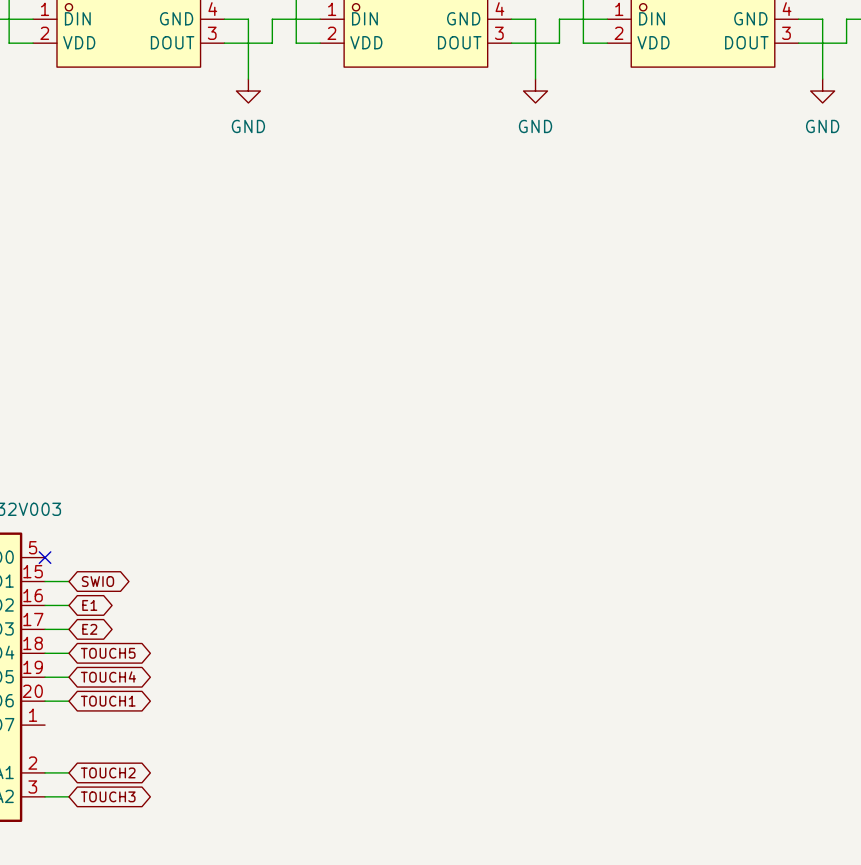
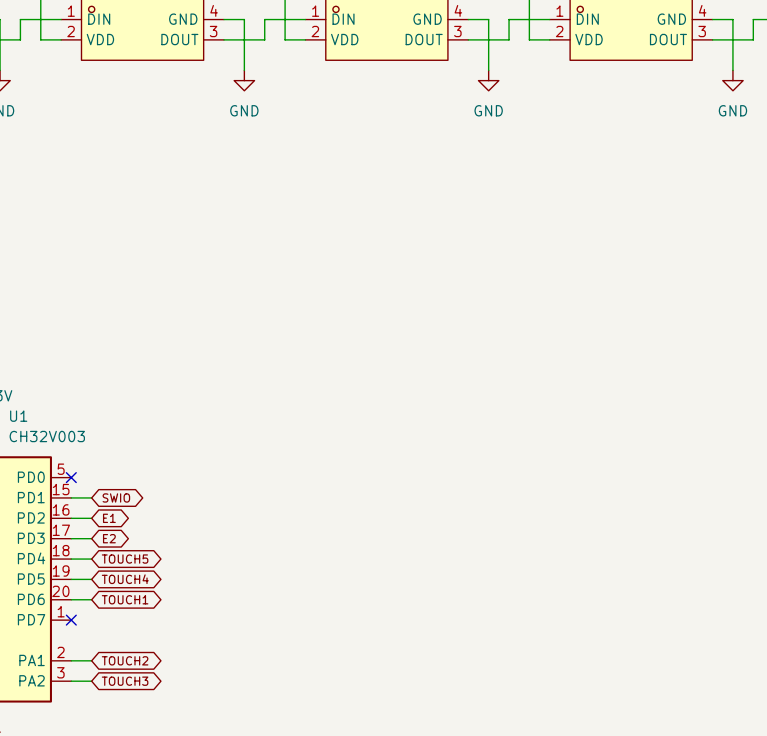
no-connect mark: none -> (71, 620)

